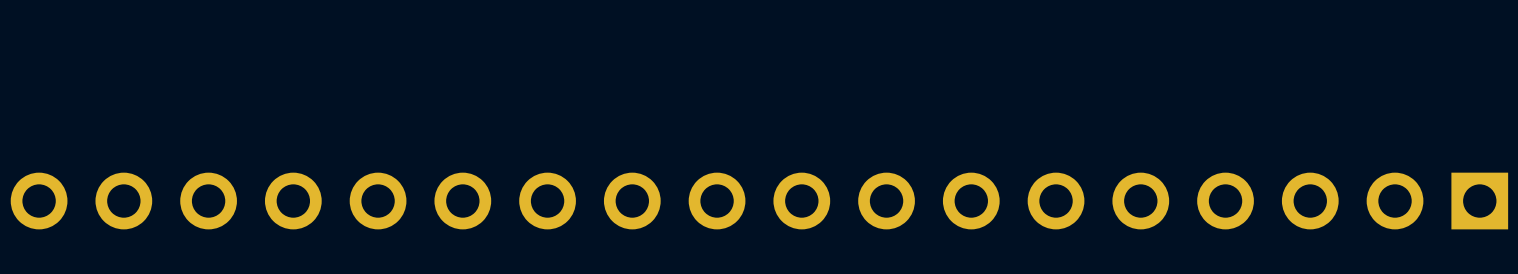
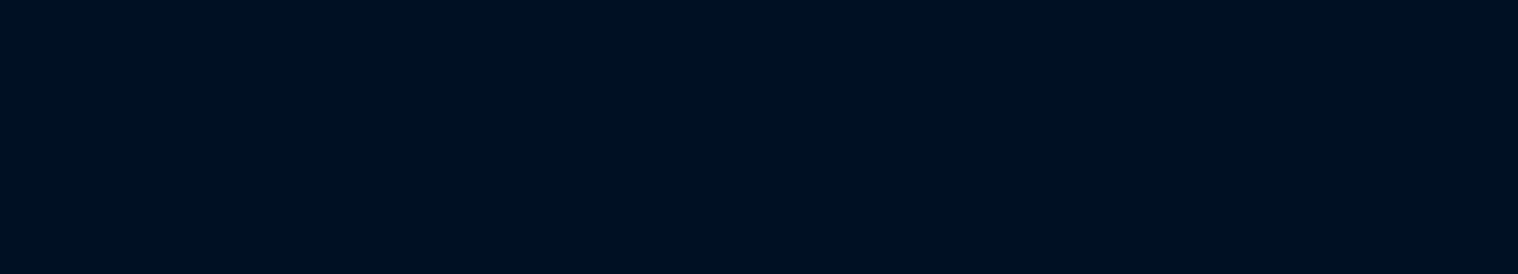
part: (759, 201) -> none

